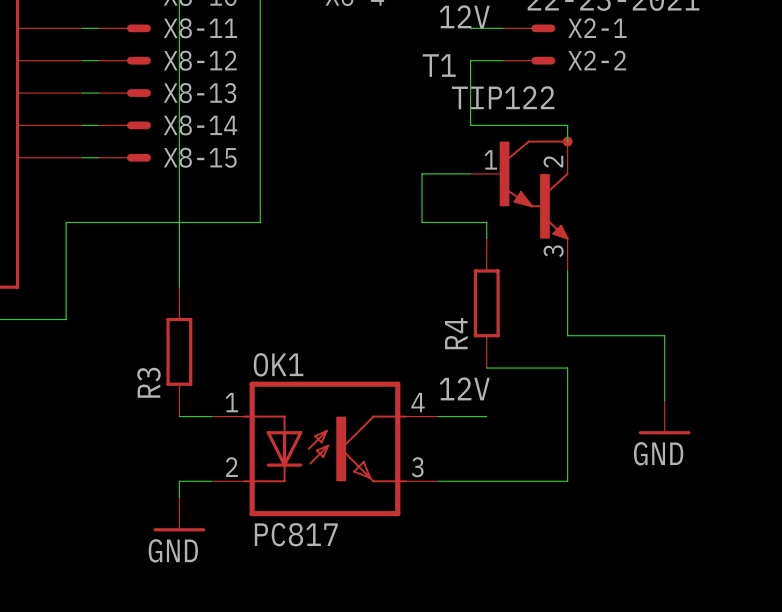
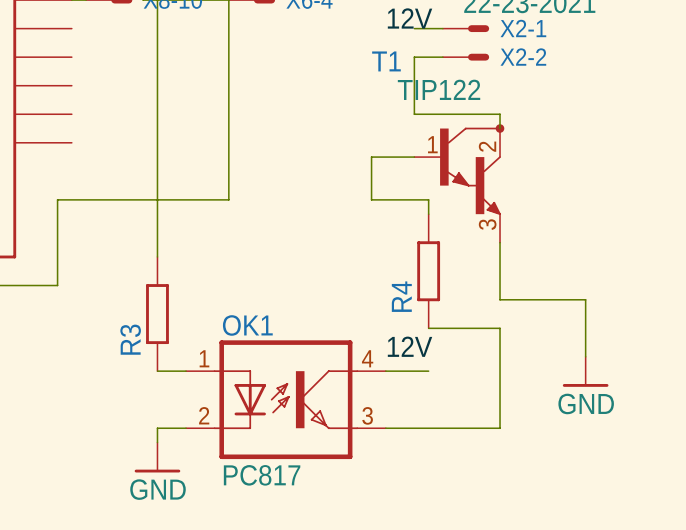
wire: (82, 28) (98, 28) -> none
X8-11: (124, 28) -> none
wire: (82, 60) (98, 60) -> none
X8-12: (124, 60) -> none
wire: (82, 93) (98, 93) -> none
X8-13: (124, 93) -> none
wire: (82, 125) (98, 125) -> none
X8-14: (124, 125) -> none
wire: (82, 157) (98, 157) -> none
X8-15: (124, 157) -> none

